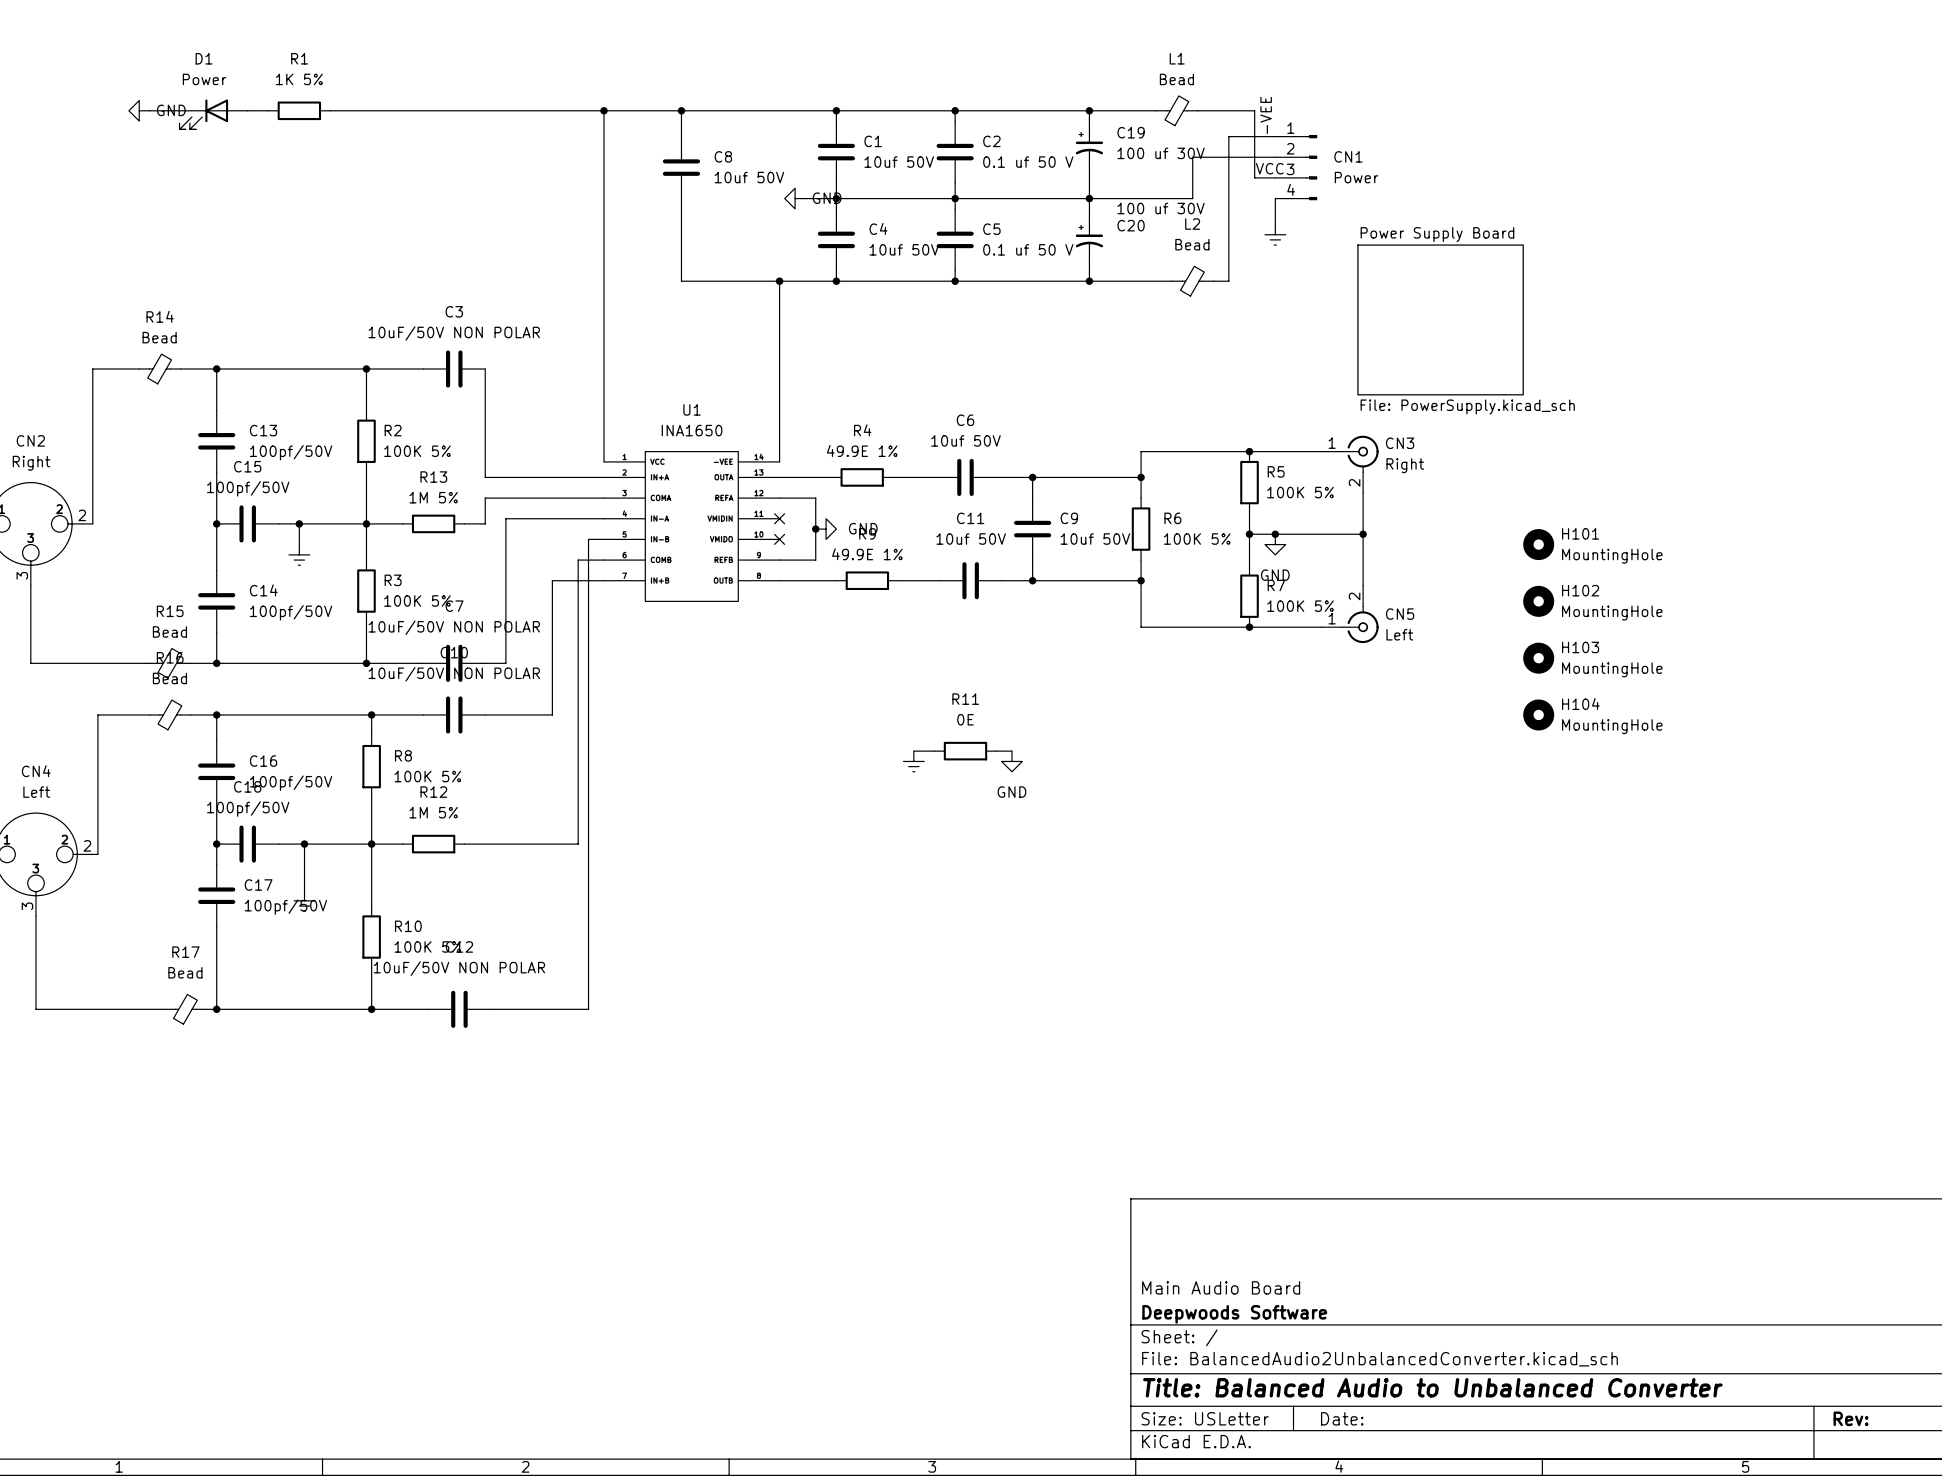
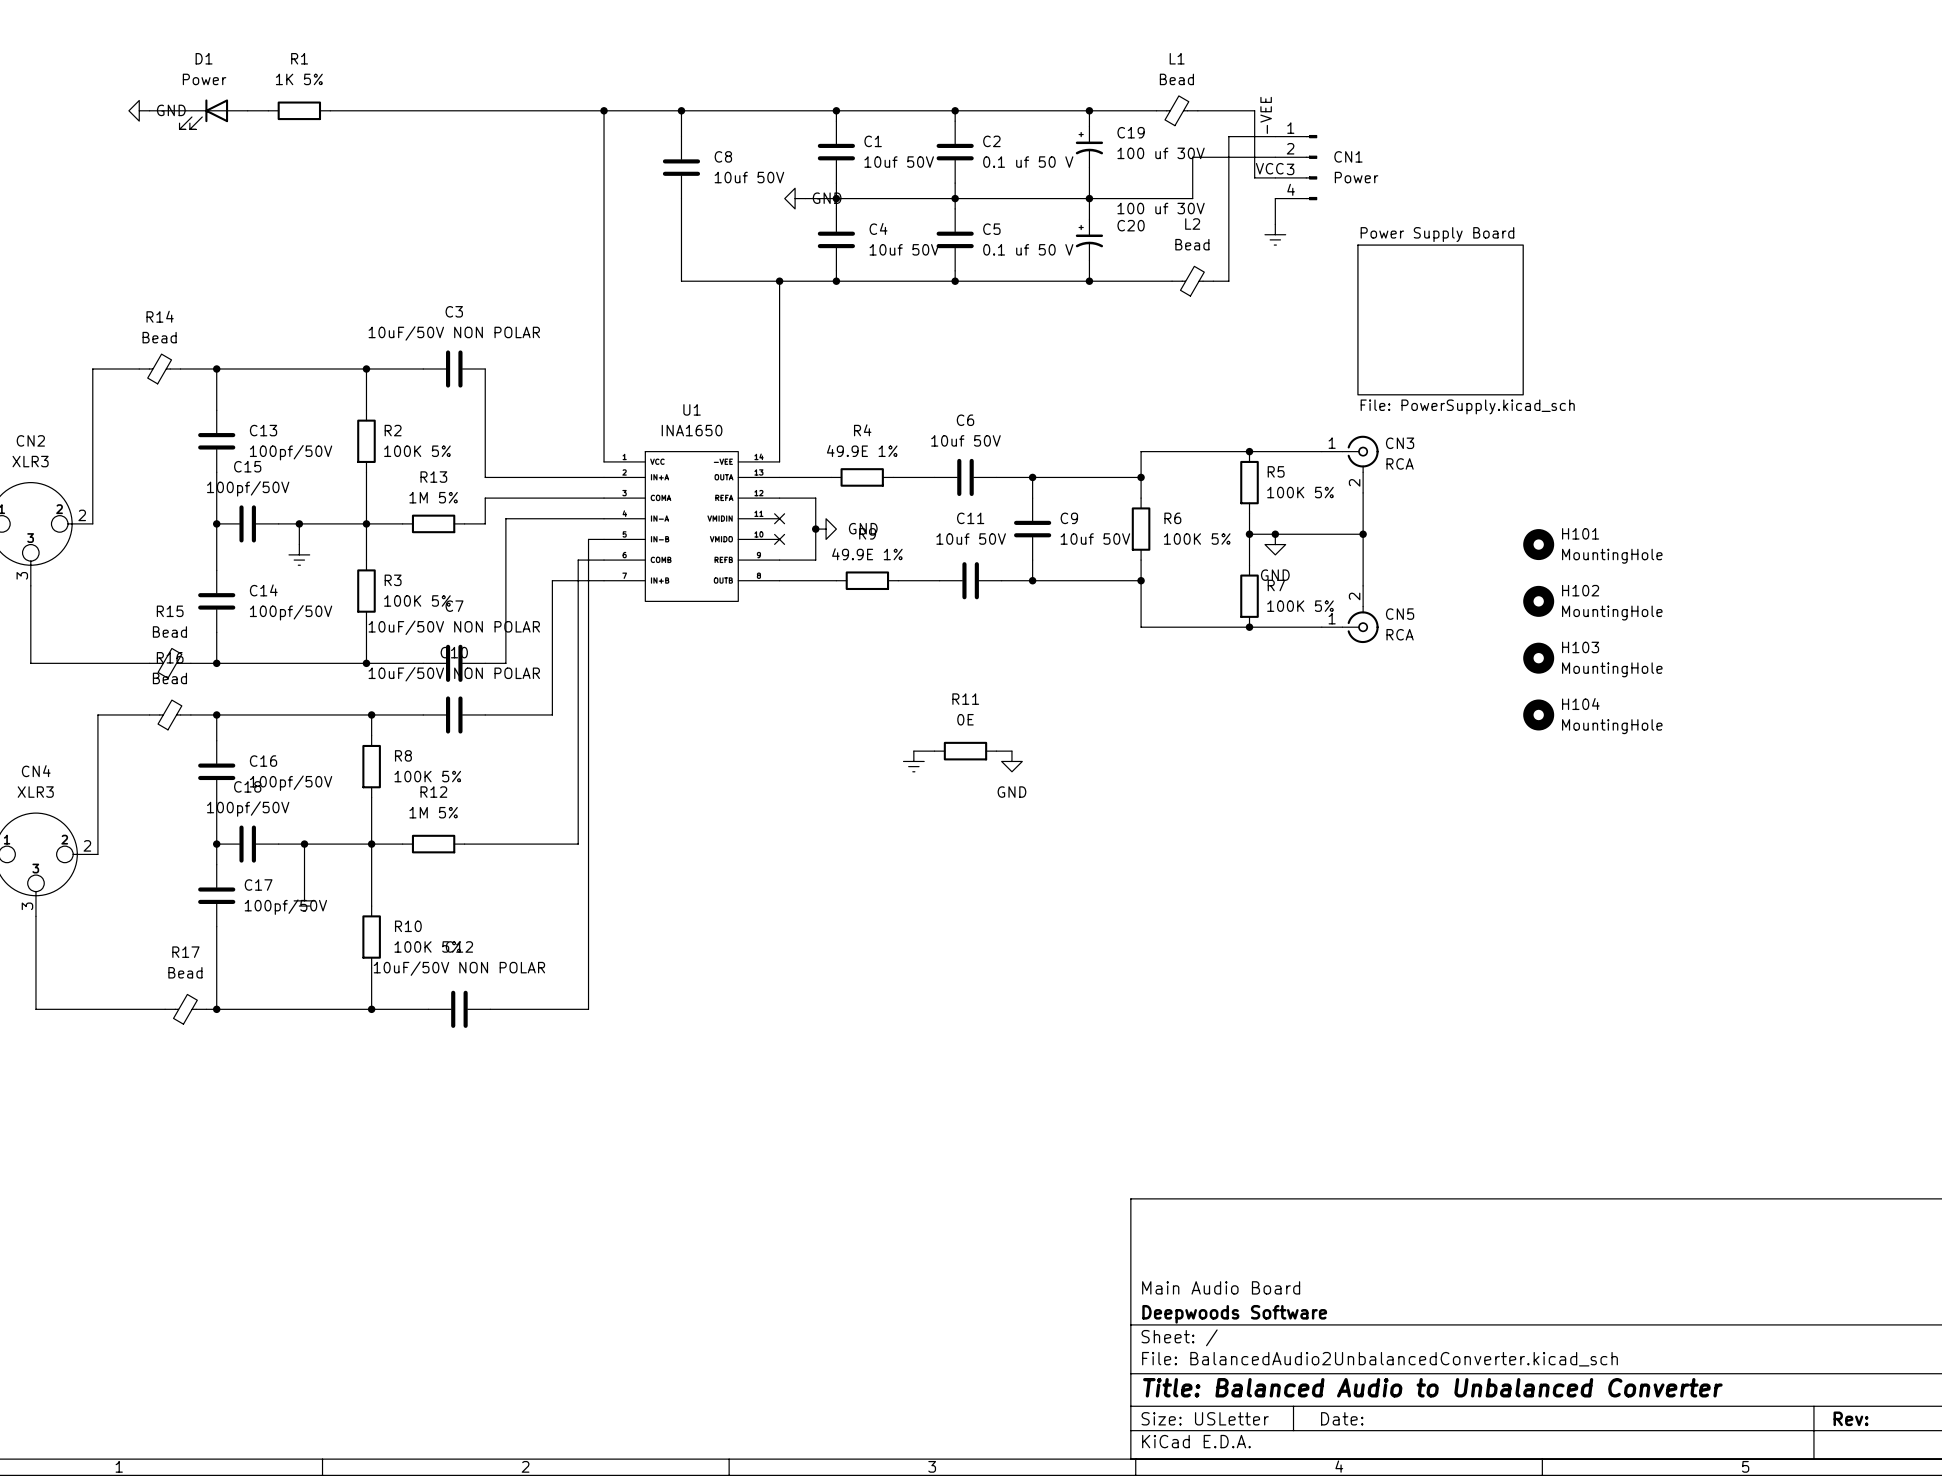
CN2 value: Right (31, 463) -> XLR3 (30, 461)
CN3 value: Right (1405, 465) -> RCA (1400, 463)
CN5 value: Left (1399, 634) -> RCA (1400, 634)
CN4 value: Left (36, 792) -> XLR3 (35, 792)

